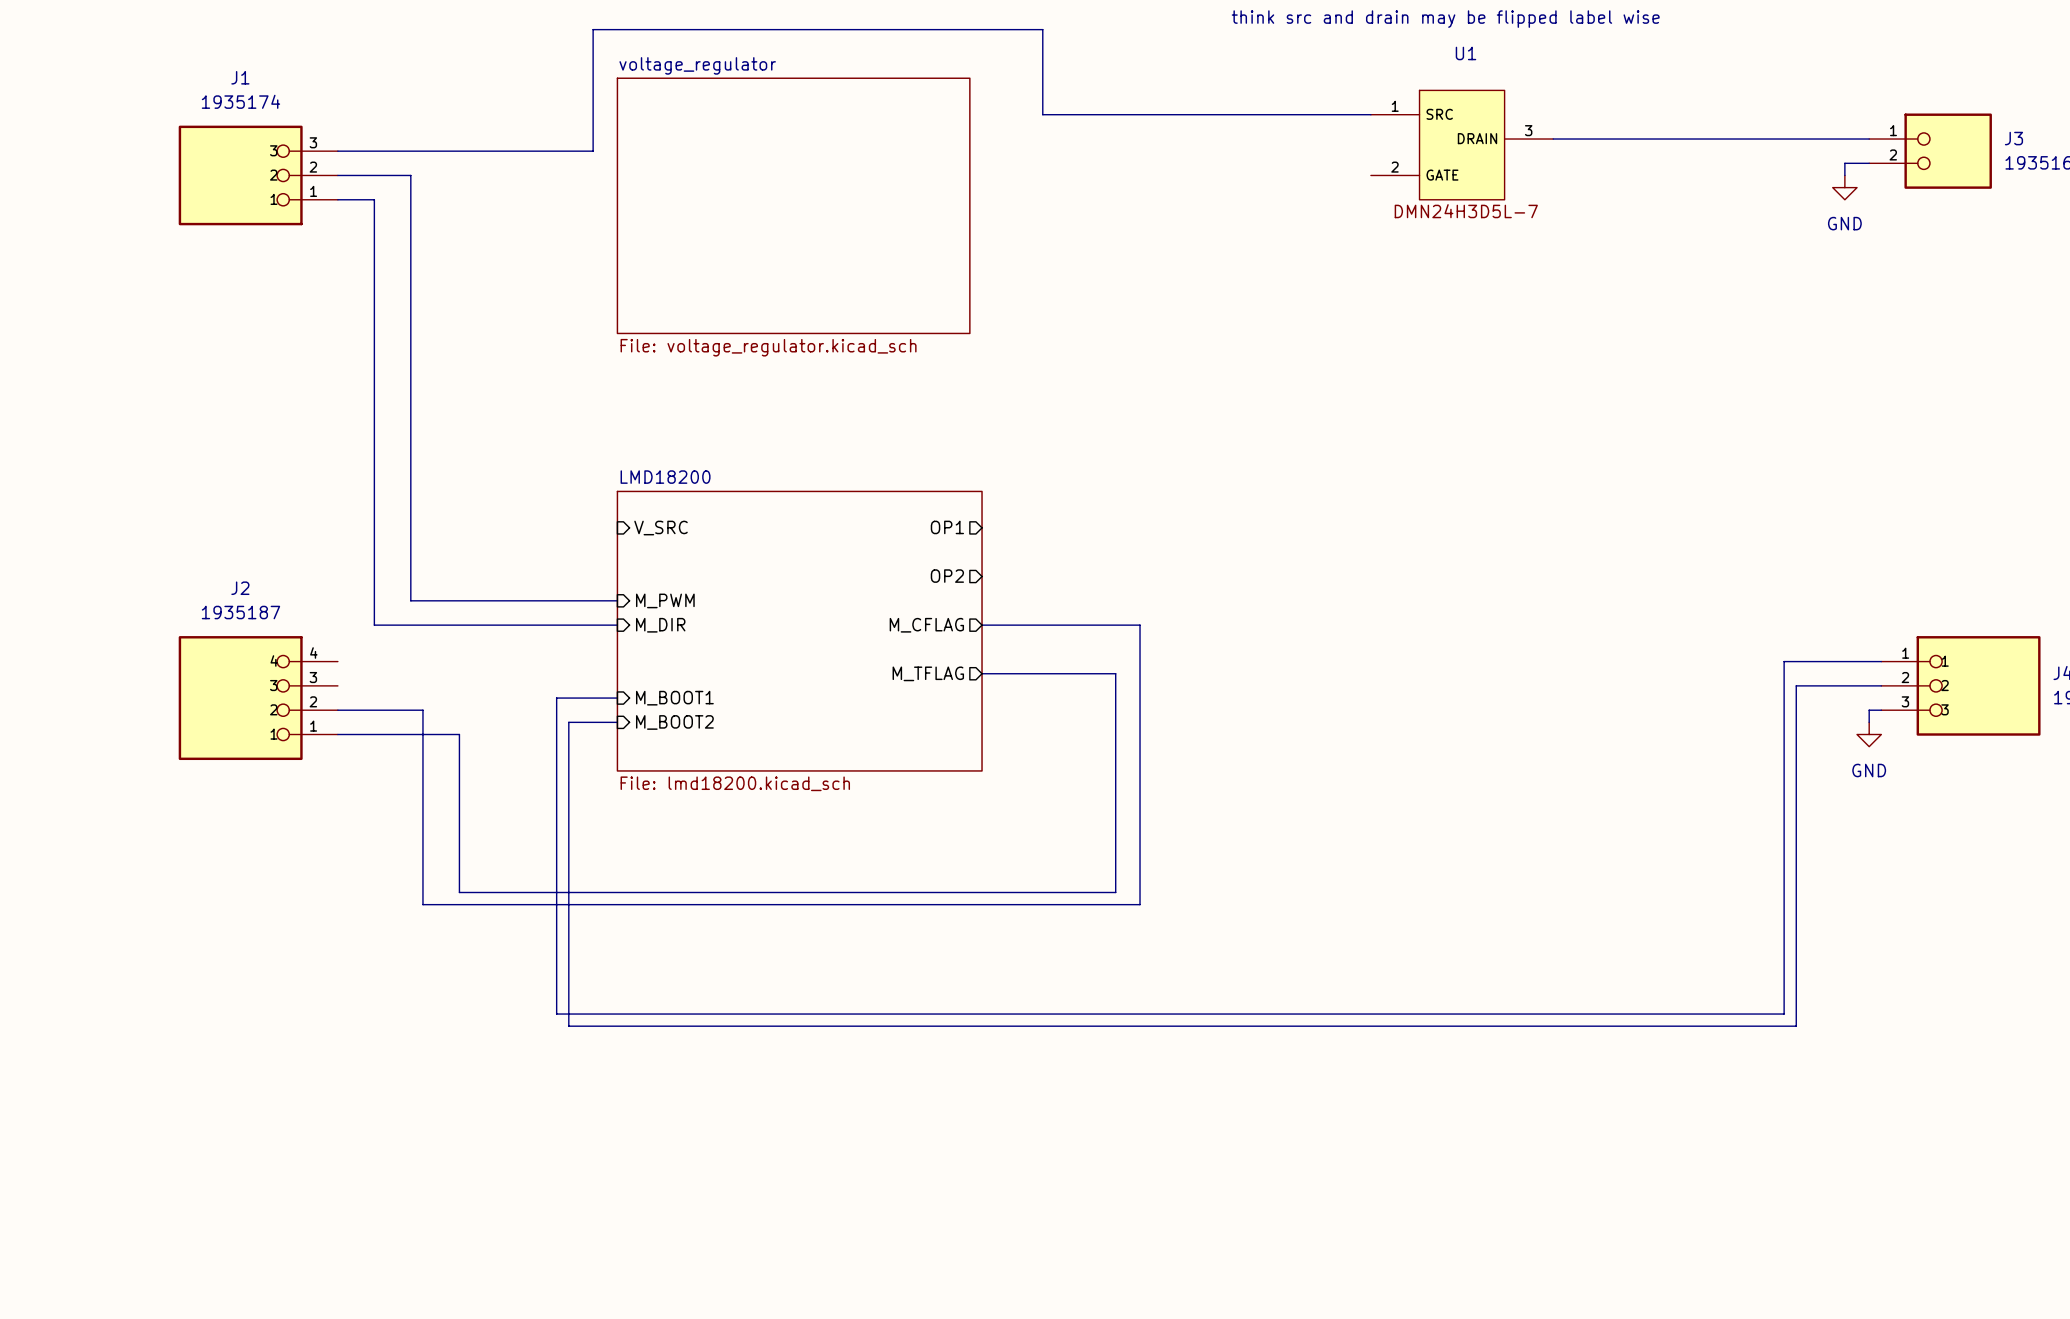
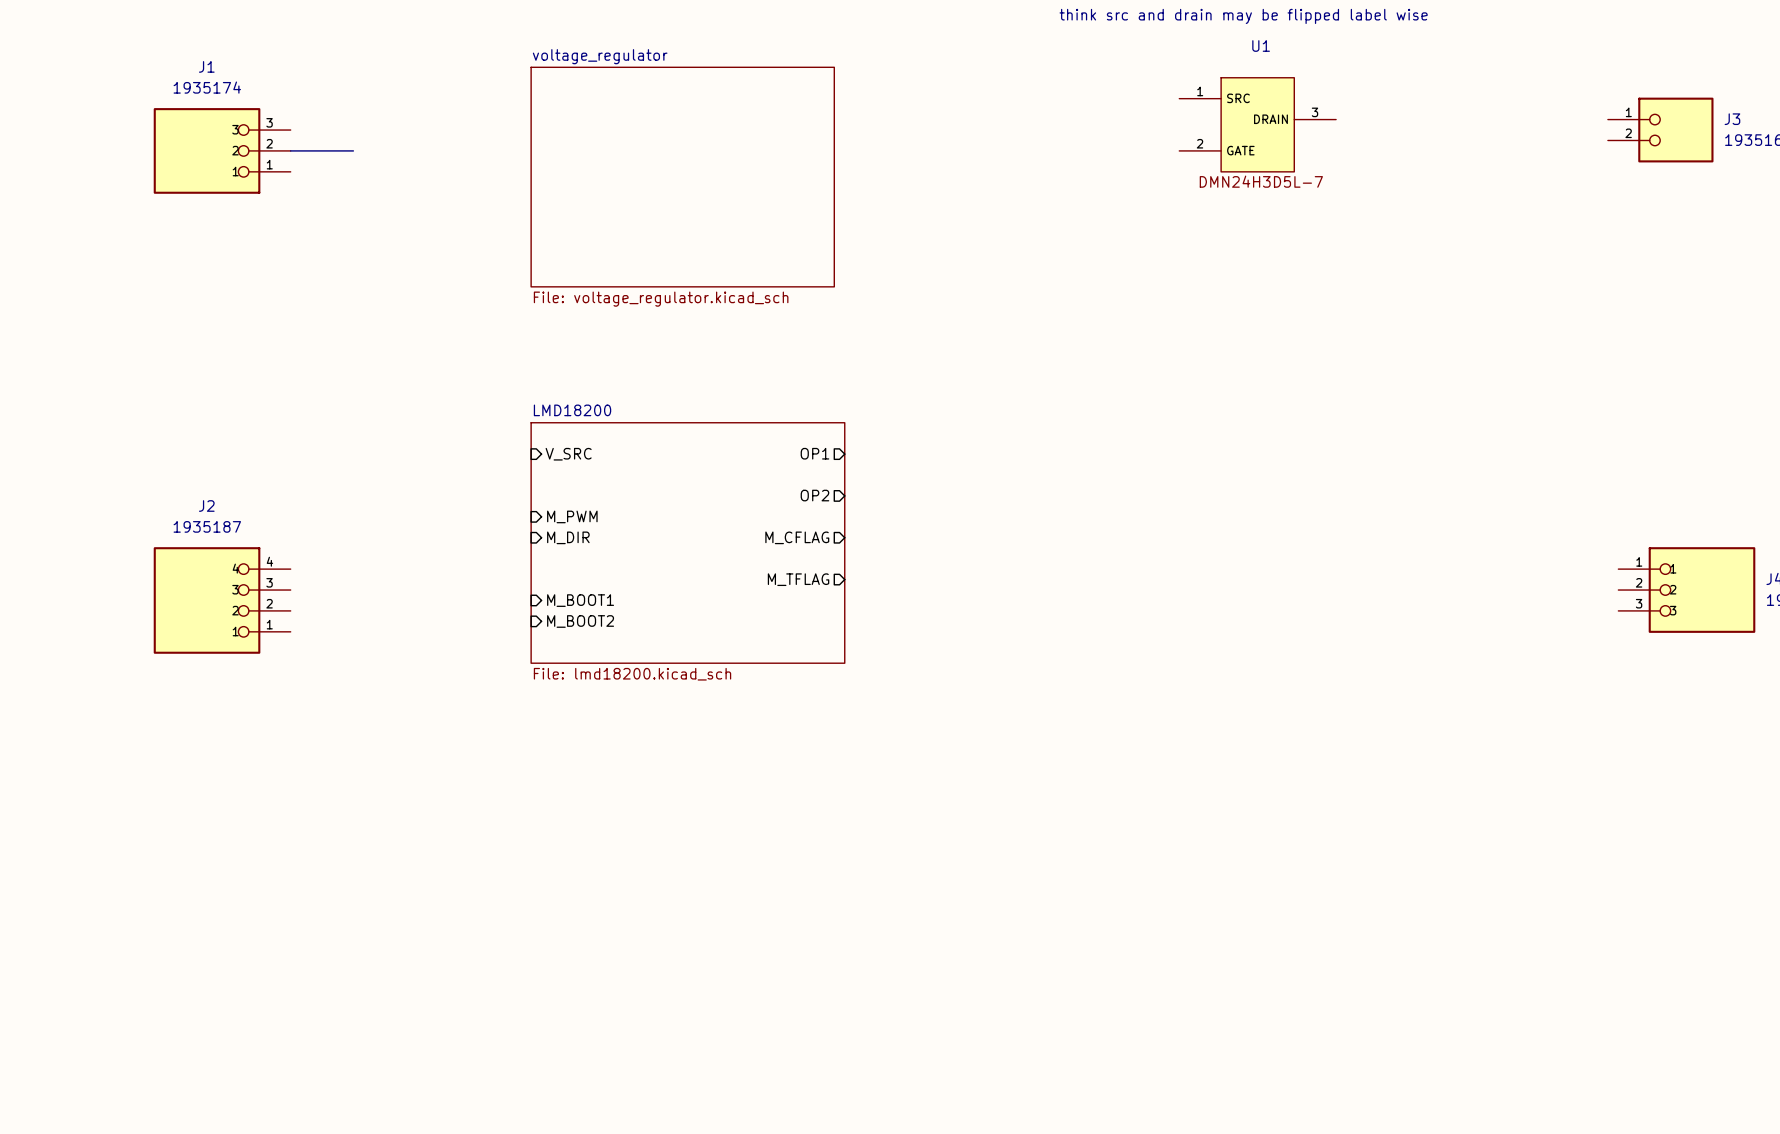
wire: (1370, 114) (1042, 114) (1042, 29) (593, 29) (593, 151) (337, 151) -> none
wire: (1553, 139) (1869, 139) -> none
wire: (1869, 163) (1844, 163) (1844, 175) -> none
wire: (410, 175) (410, 600) (617, 600) -> none
power symbol: GND (1844, 187) -> none
wire: (337, 199) (374, 199) (374, 625) (617, 625) -> none
wire: (982, 625) (1140, 625) (1140, 904) (422, 904) (422, 710) (337, 710) -> none
wire: (1881, 661) (1784, 661) (1784, 1014) (556, 1014) (556, 698) (617, 698) -> none
wire: (982, 673) (1115, 673) (1115, 892) (459, 892) (459, 734) (337, 734) -> none
wire: (1881, 685) (1796, 685) (1796, 1026) (568, 1026) (568, 722) (617, 722) -> none
wire: (1881, 710) (1869, 710) (1869, 722) -> none
power symbol: GND (1869, 734) -> none

